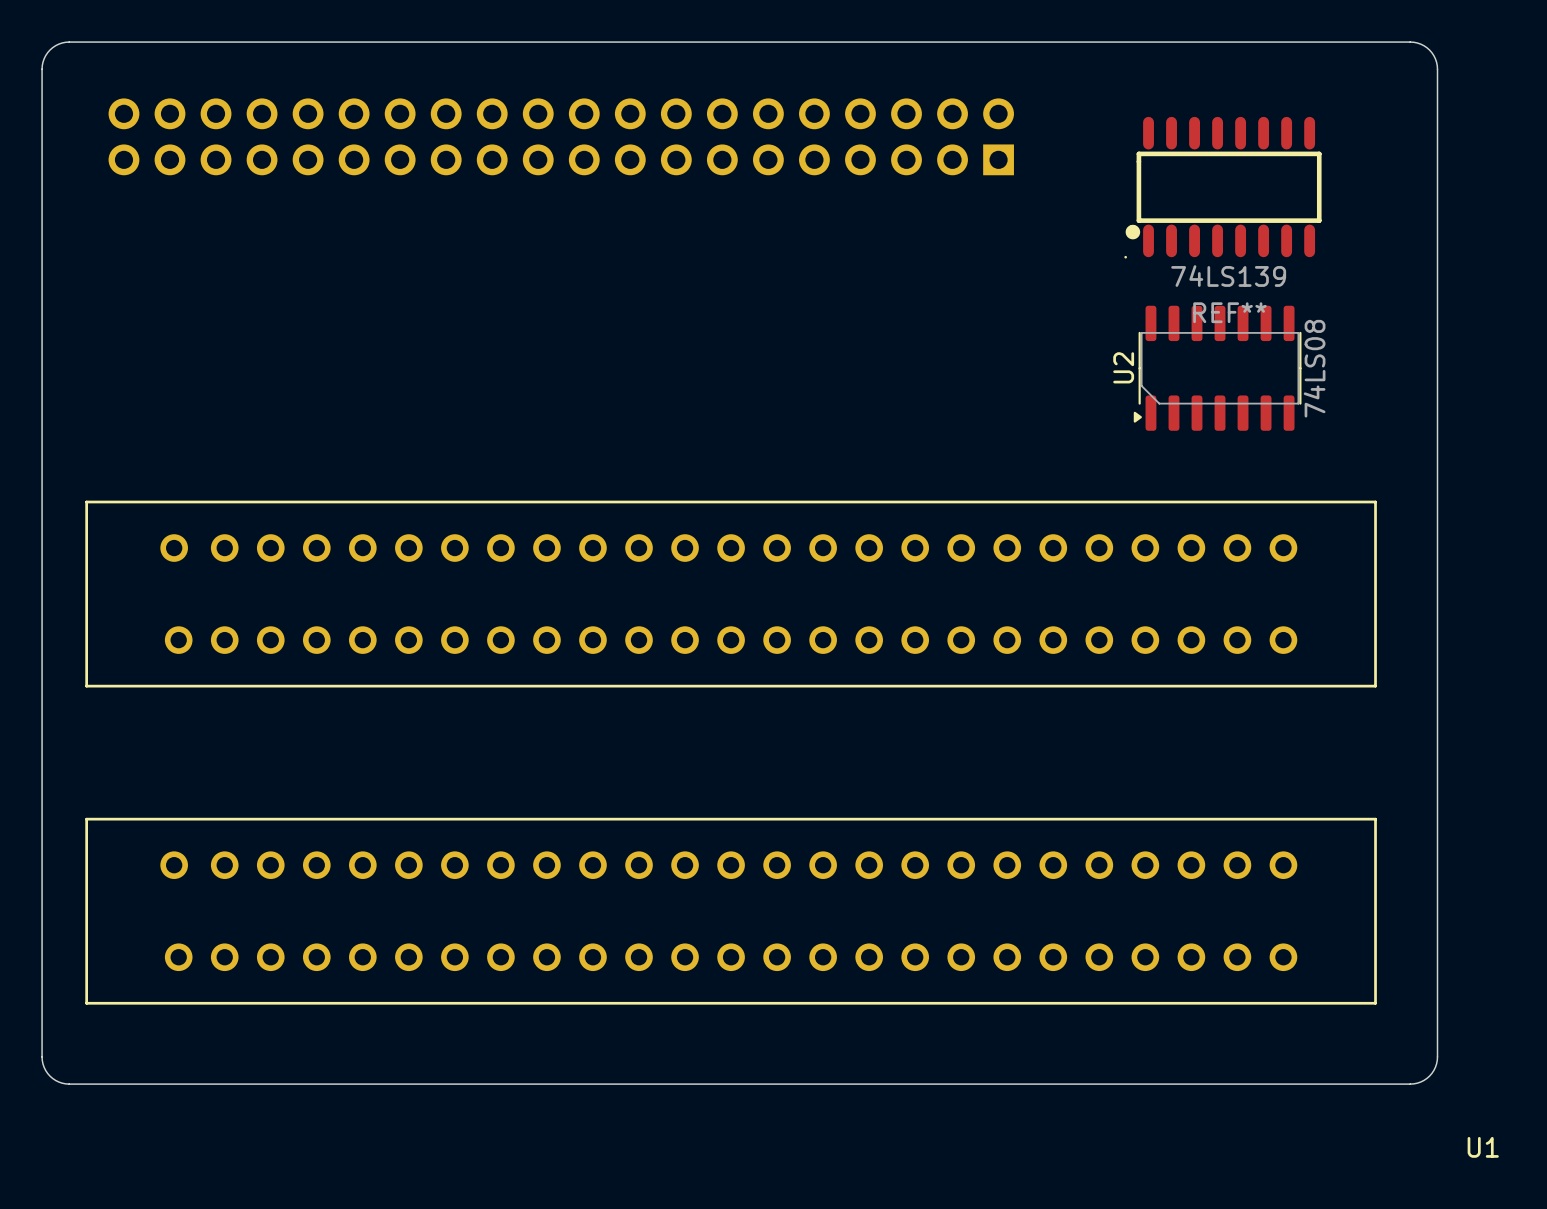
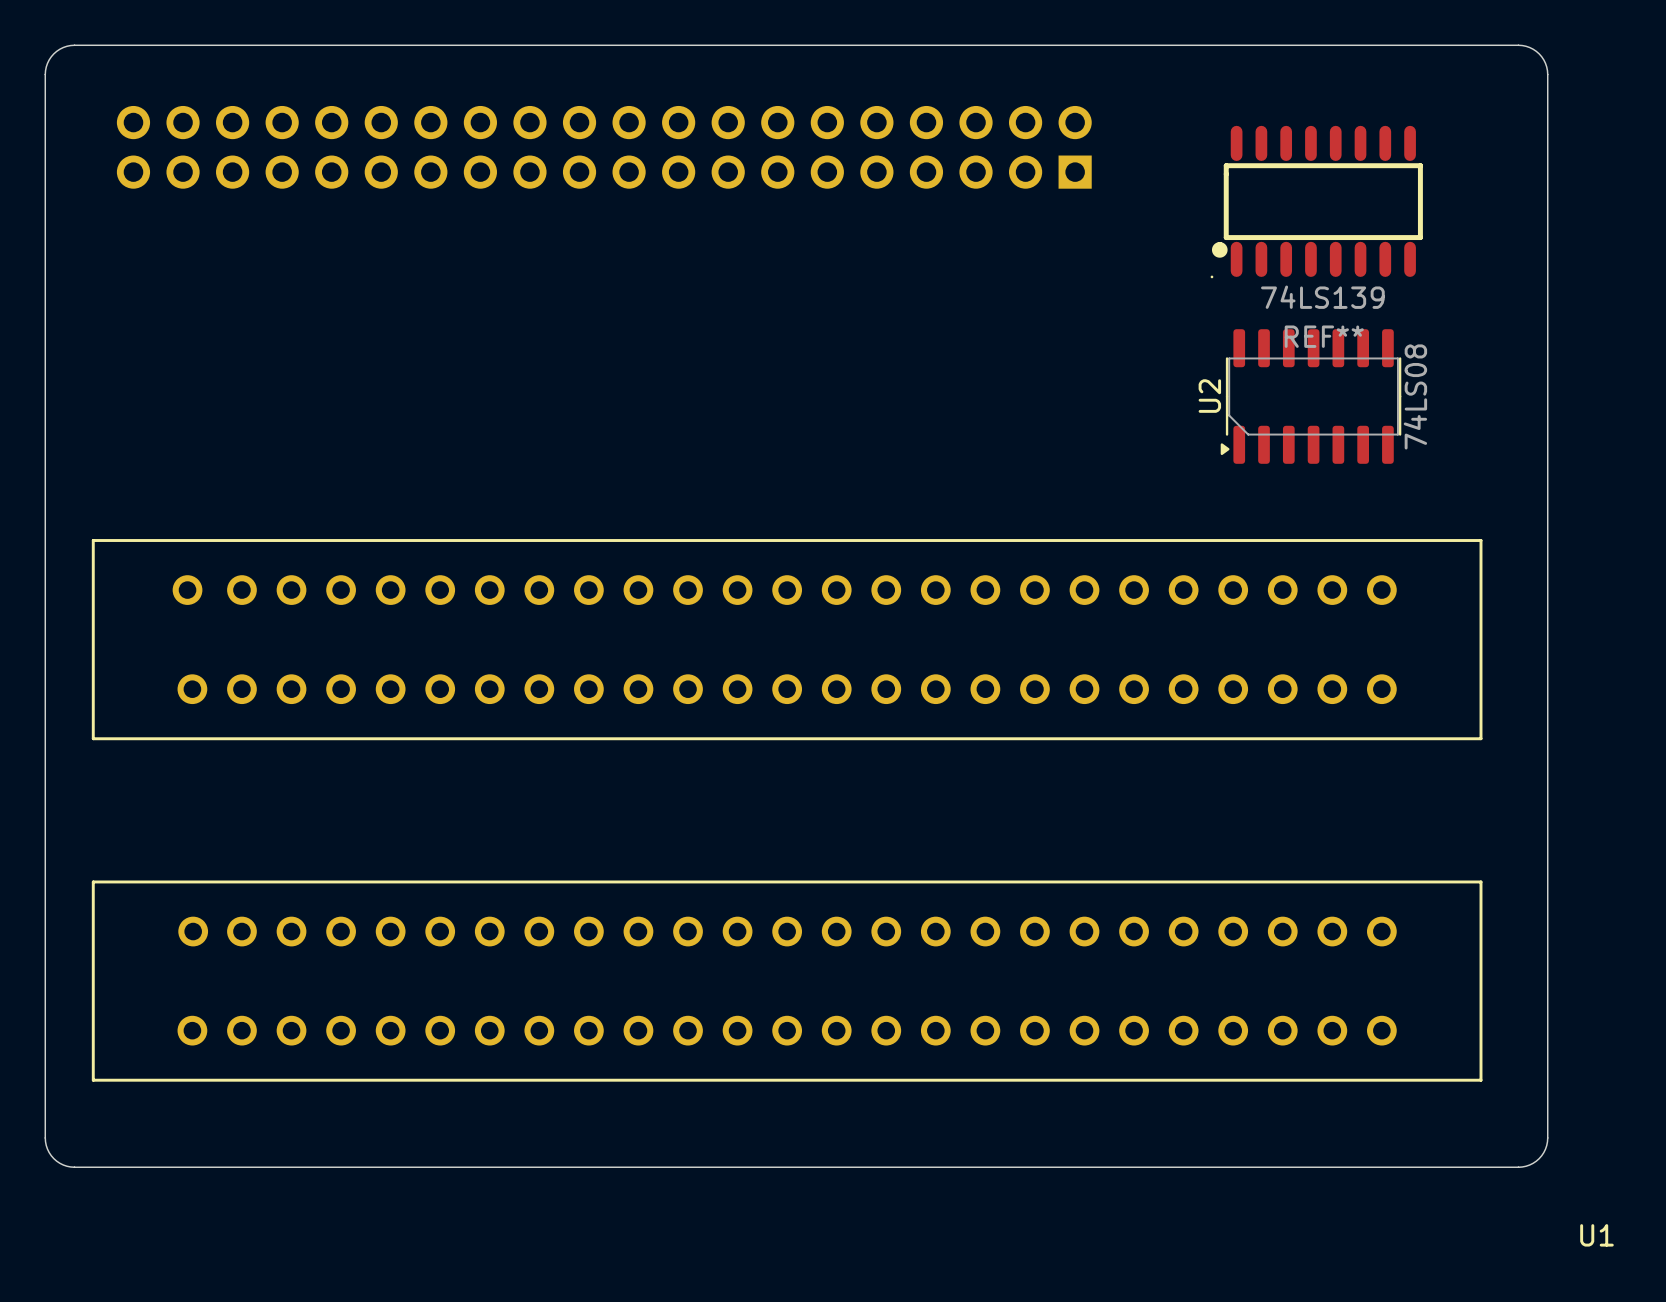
part footprint: [85, 817, 1377, 1005] -> [91, 880, 1483, 1082]

